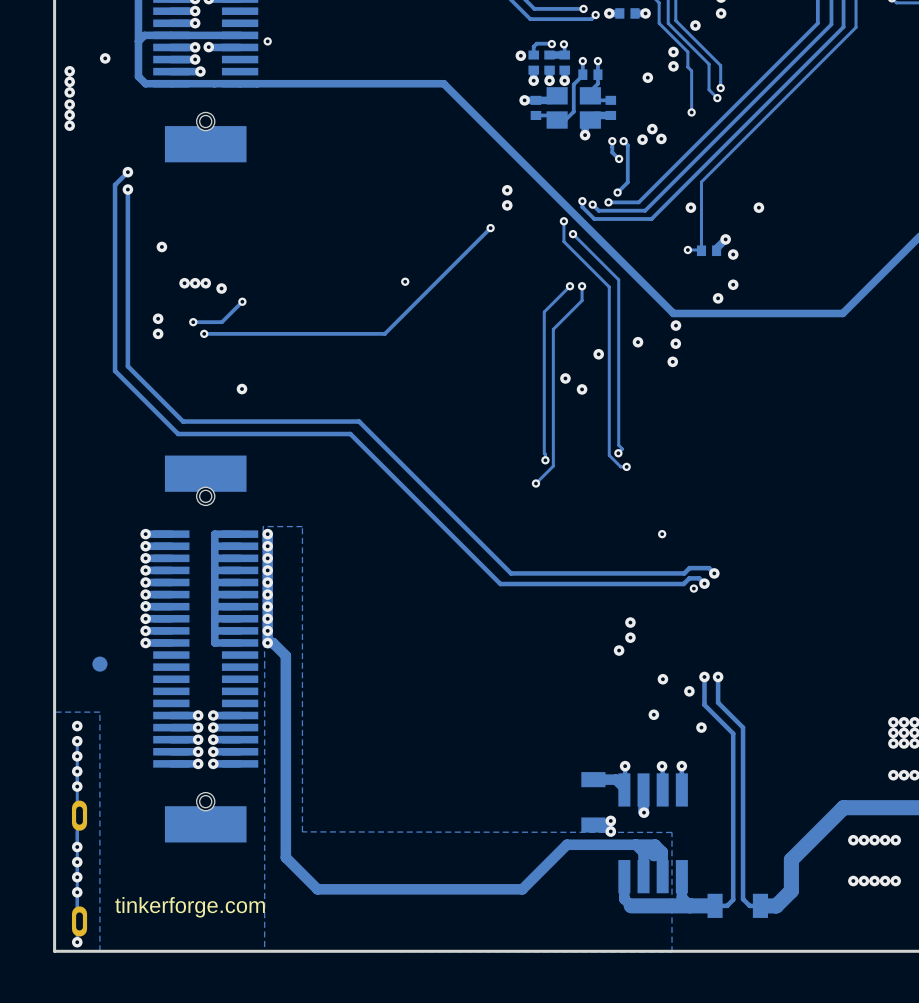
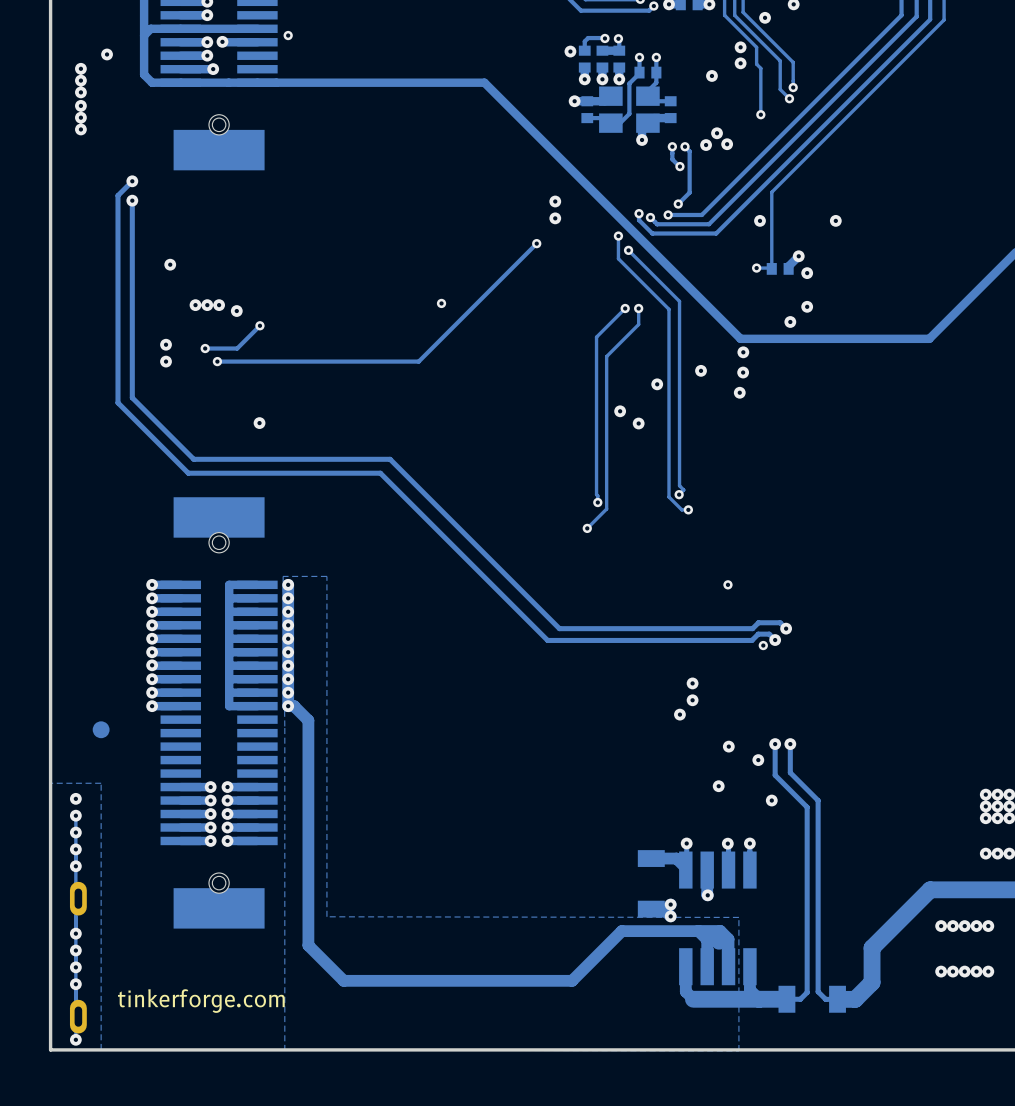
via: (69, 71) -> none
via: none -> (80, 68)
via: (69, 81) -> none
via: none -> (80, 80)
via: (69, 92) -> none
via: none -> (80, 92)
via: (69, 104) -> none
via: none -> (80, 105)
via: (69, 115) -> none
via: none -> (80, 117)
via: (69, 125) -> none
via: none -> (80, 129)

